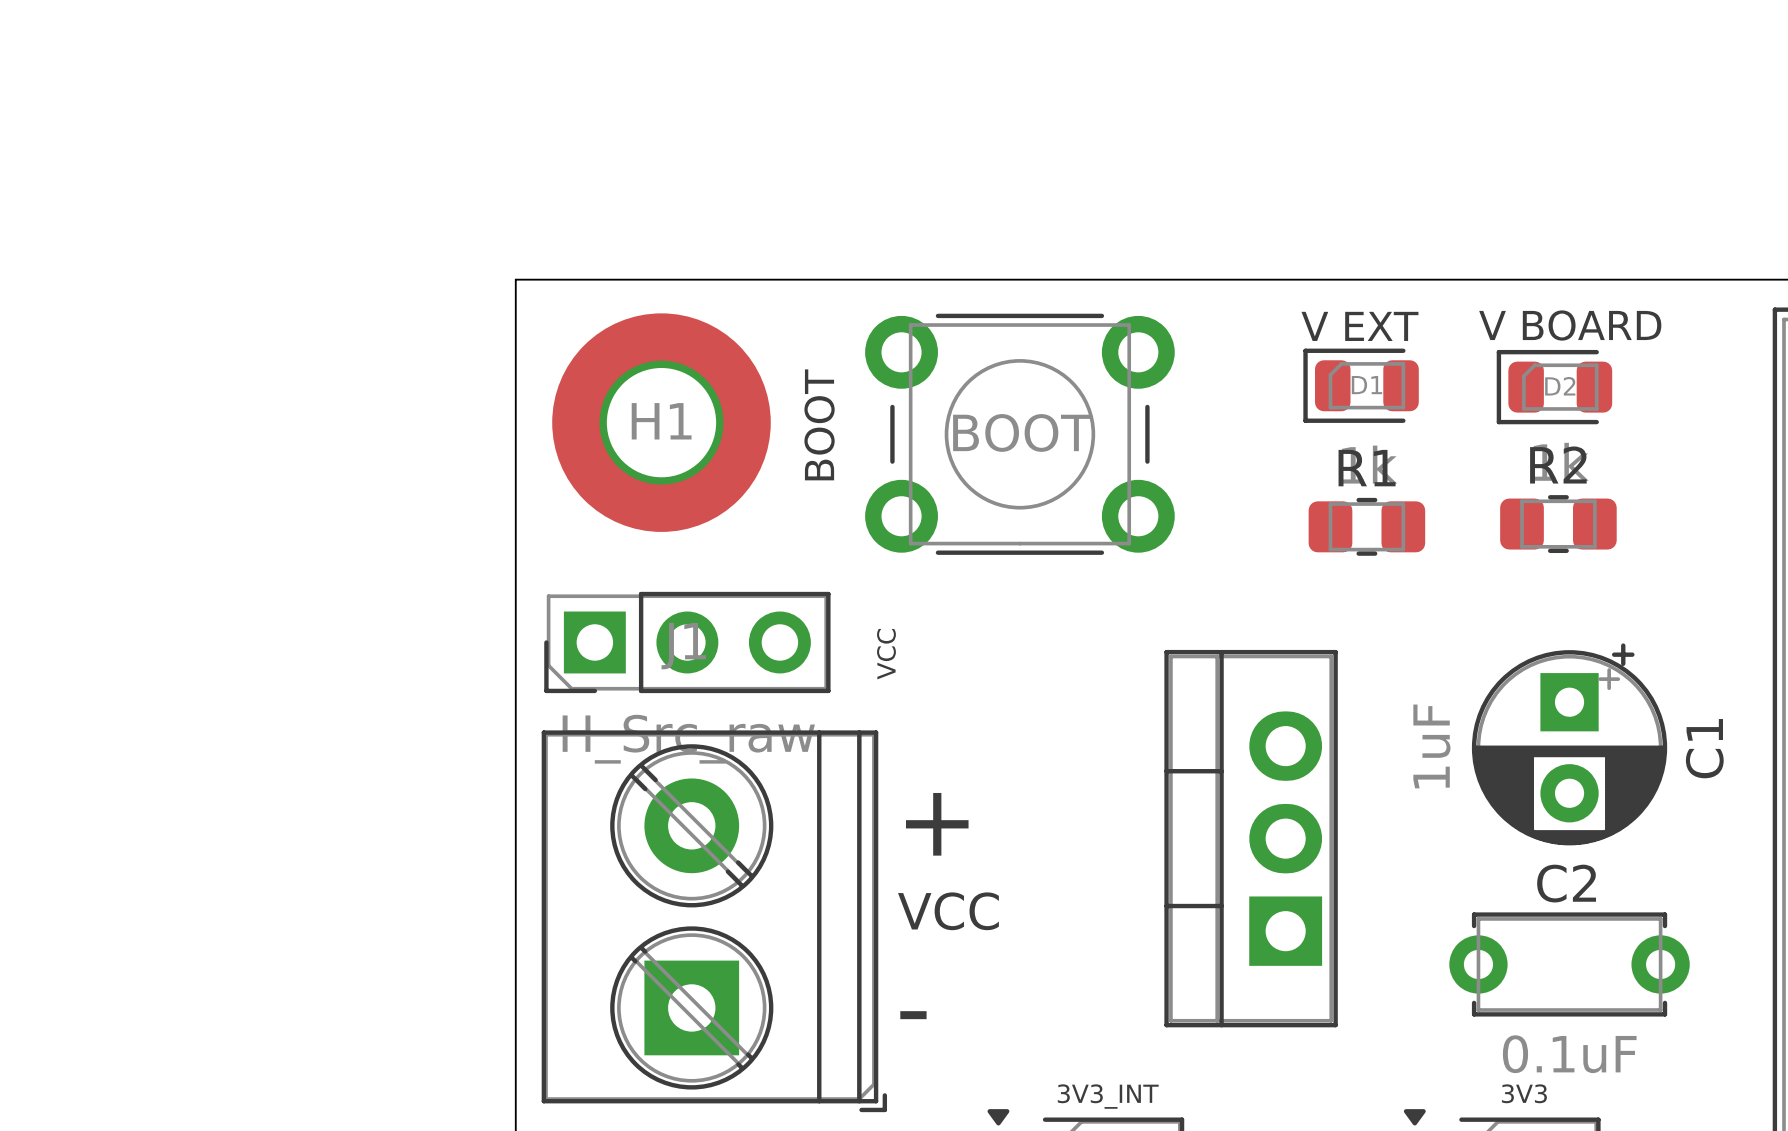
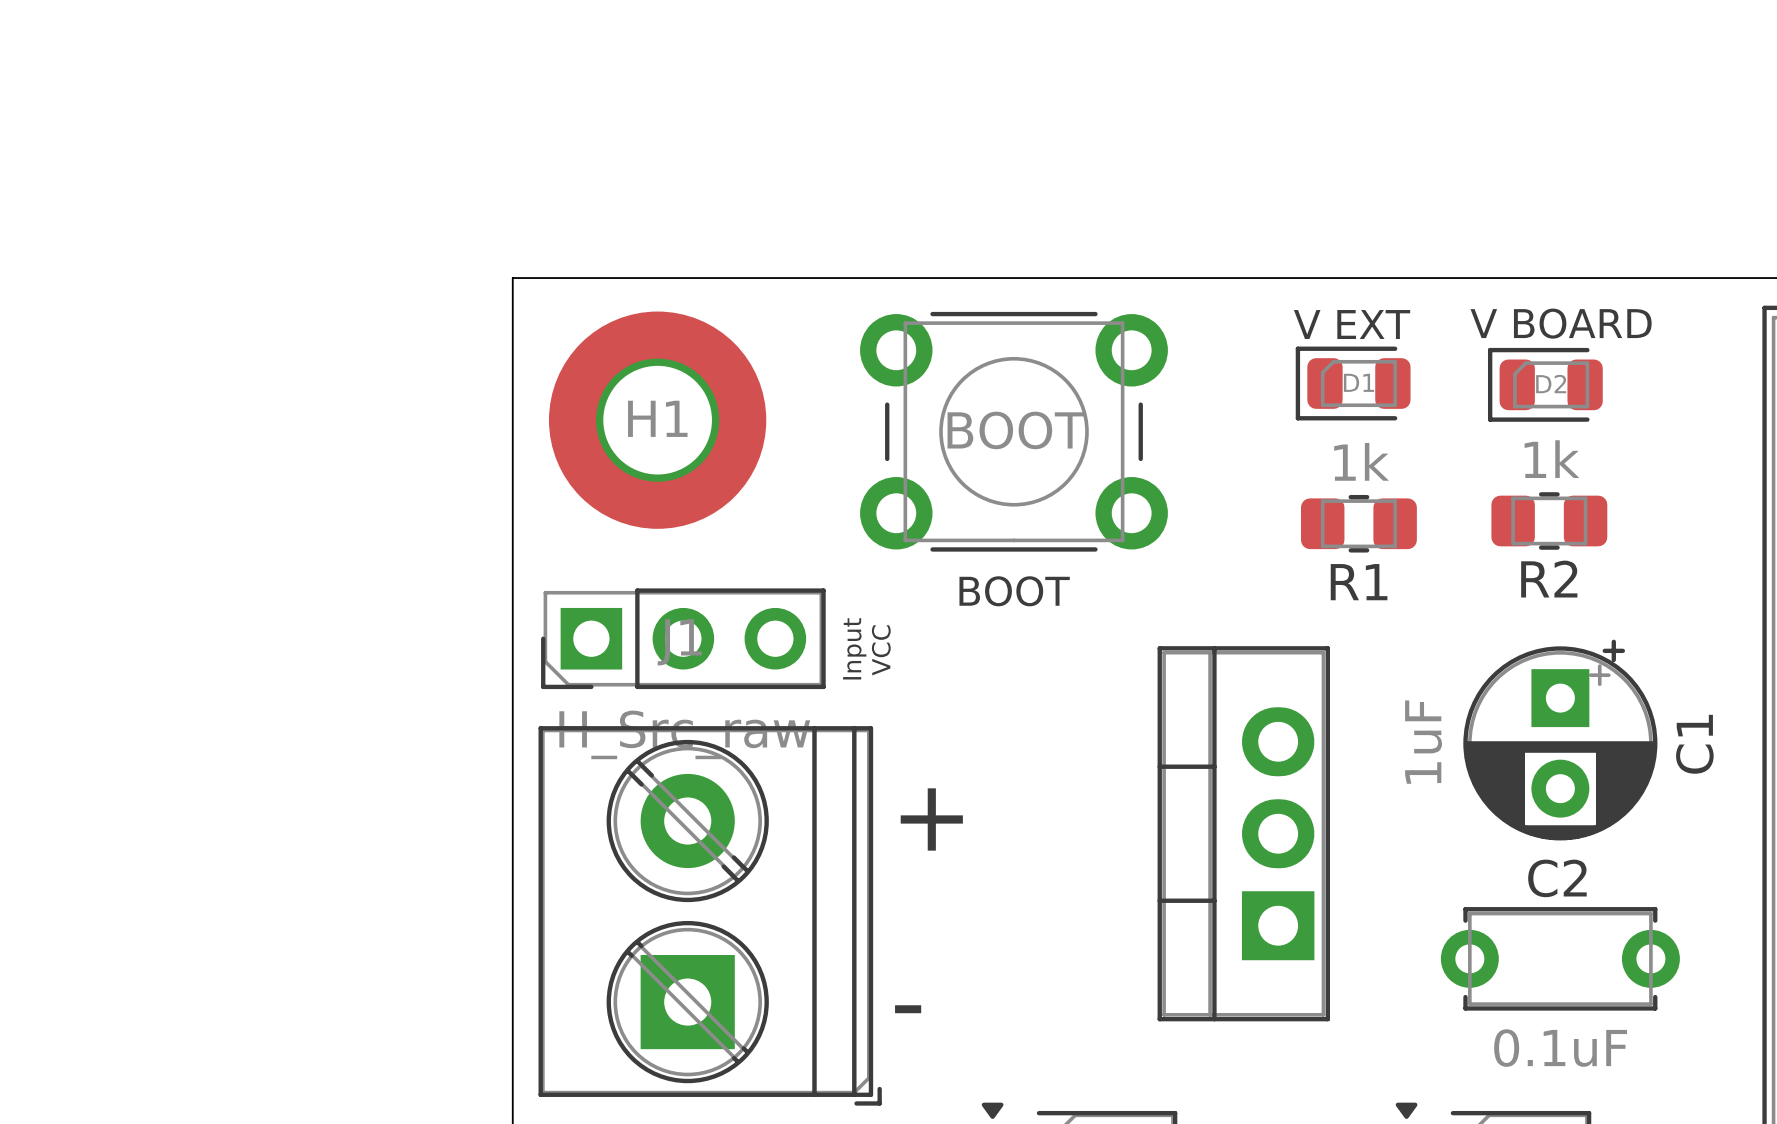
text rotation: 0° (819, 424) -> 90° clockwise (1014, 591)
text position: BOOT (819, 424) -> BOOT (1014, 591)
R2 name position: R2 (1558, 464) -> R2 (1549, 579)
R1 name position: R1 (1367, 468) -> R1 (1359, 582)
text: none -> Input (854, 648)
text: VCC (948, 911) -> none
text: 3V3 (1524, 1093) -> none
text: 3V3_INT (1108, 1096) -> none

